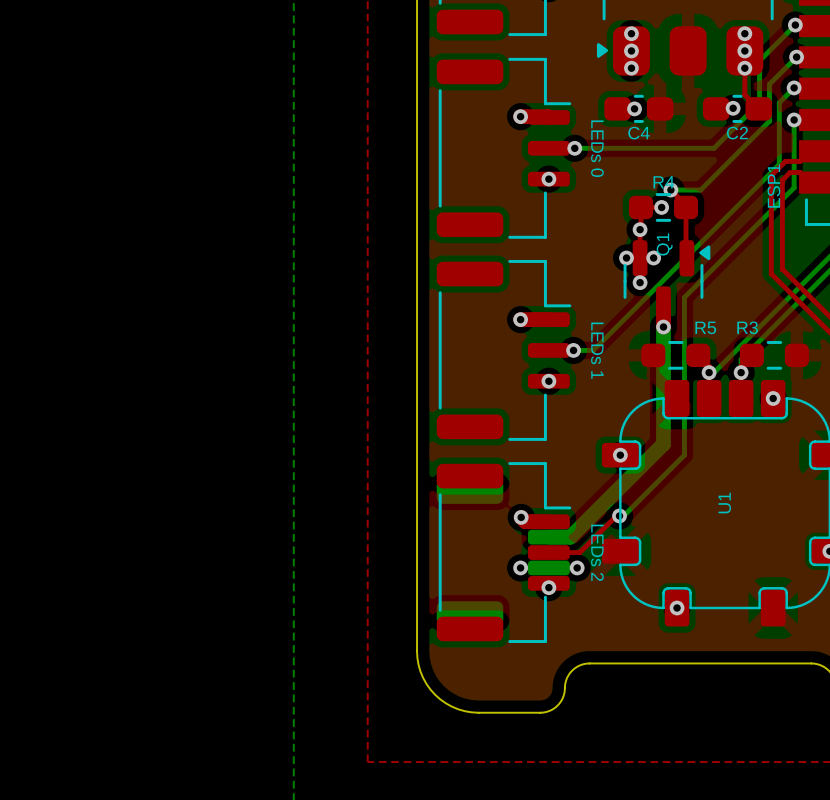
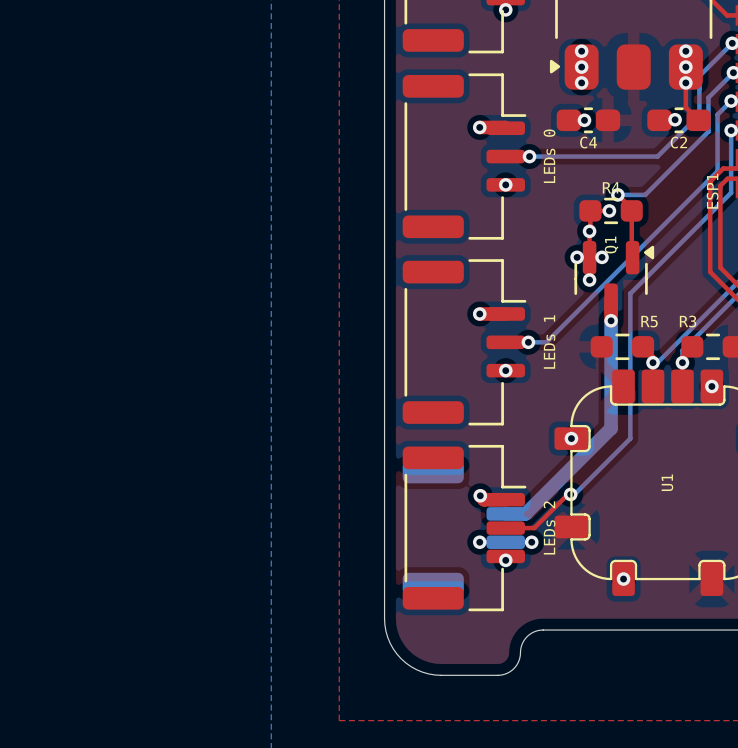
part value rotation: 0° (597, 148) -> 180° (549, 156)
part value rotation: 0° (597, 350) -> 180° (549, 342)
part value rotation: 0° (597, 552) -> 180° (549, 527)

